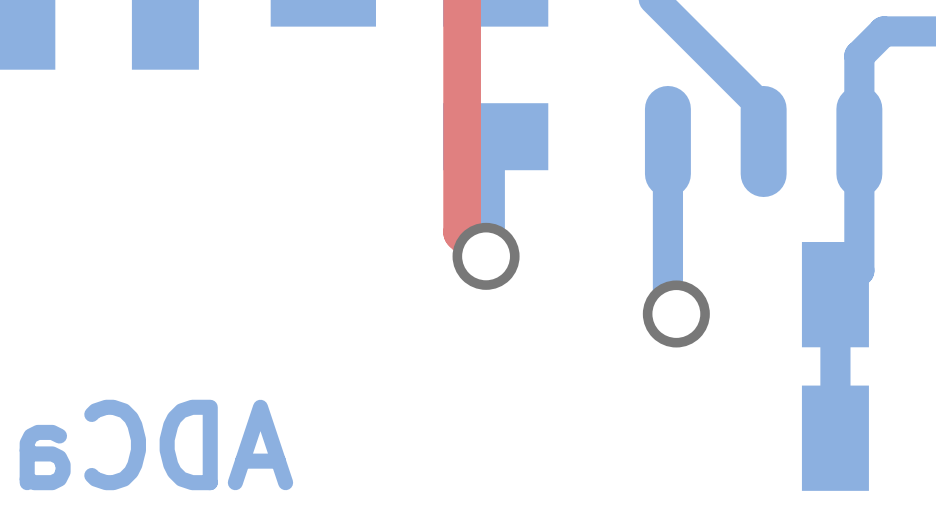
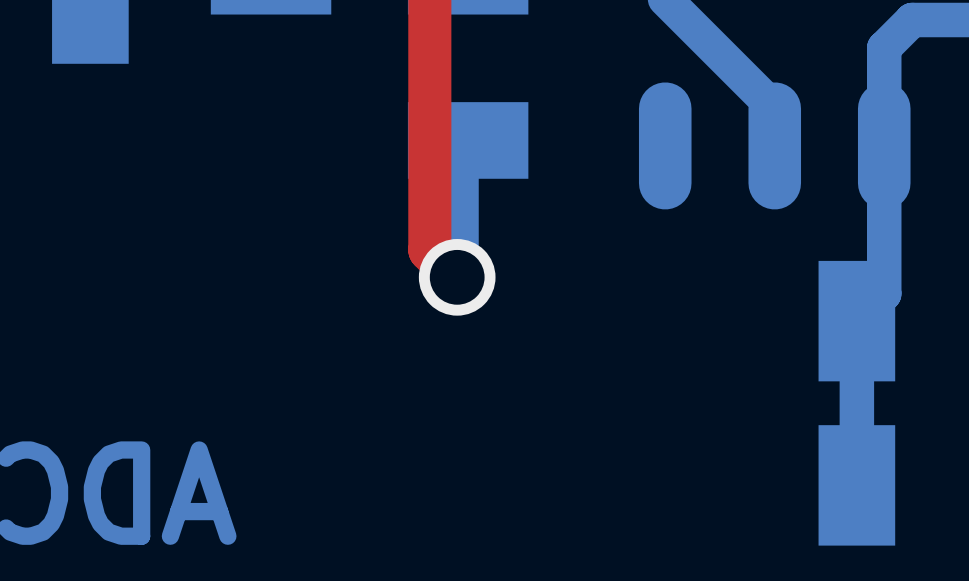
bottom track: (667, 141) (667, 305) (676, 313) -> none
via: (676, 313) -> none

